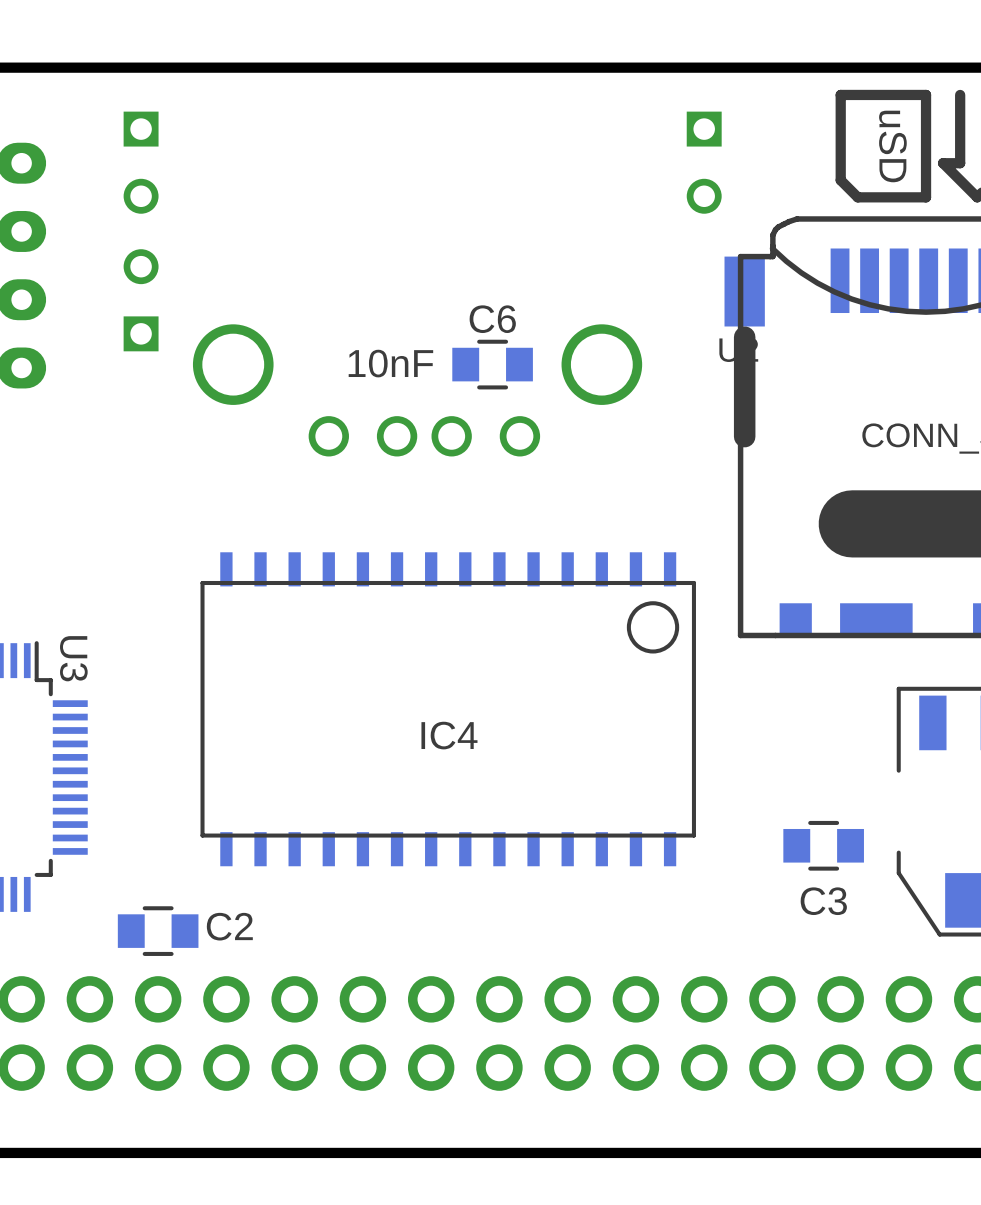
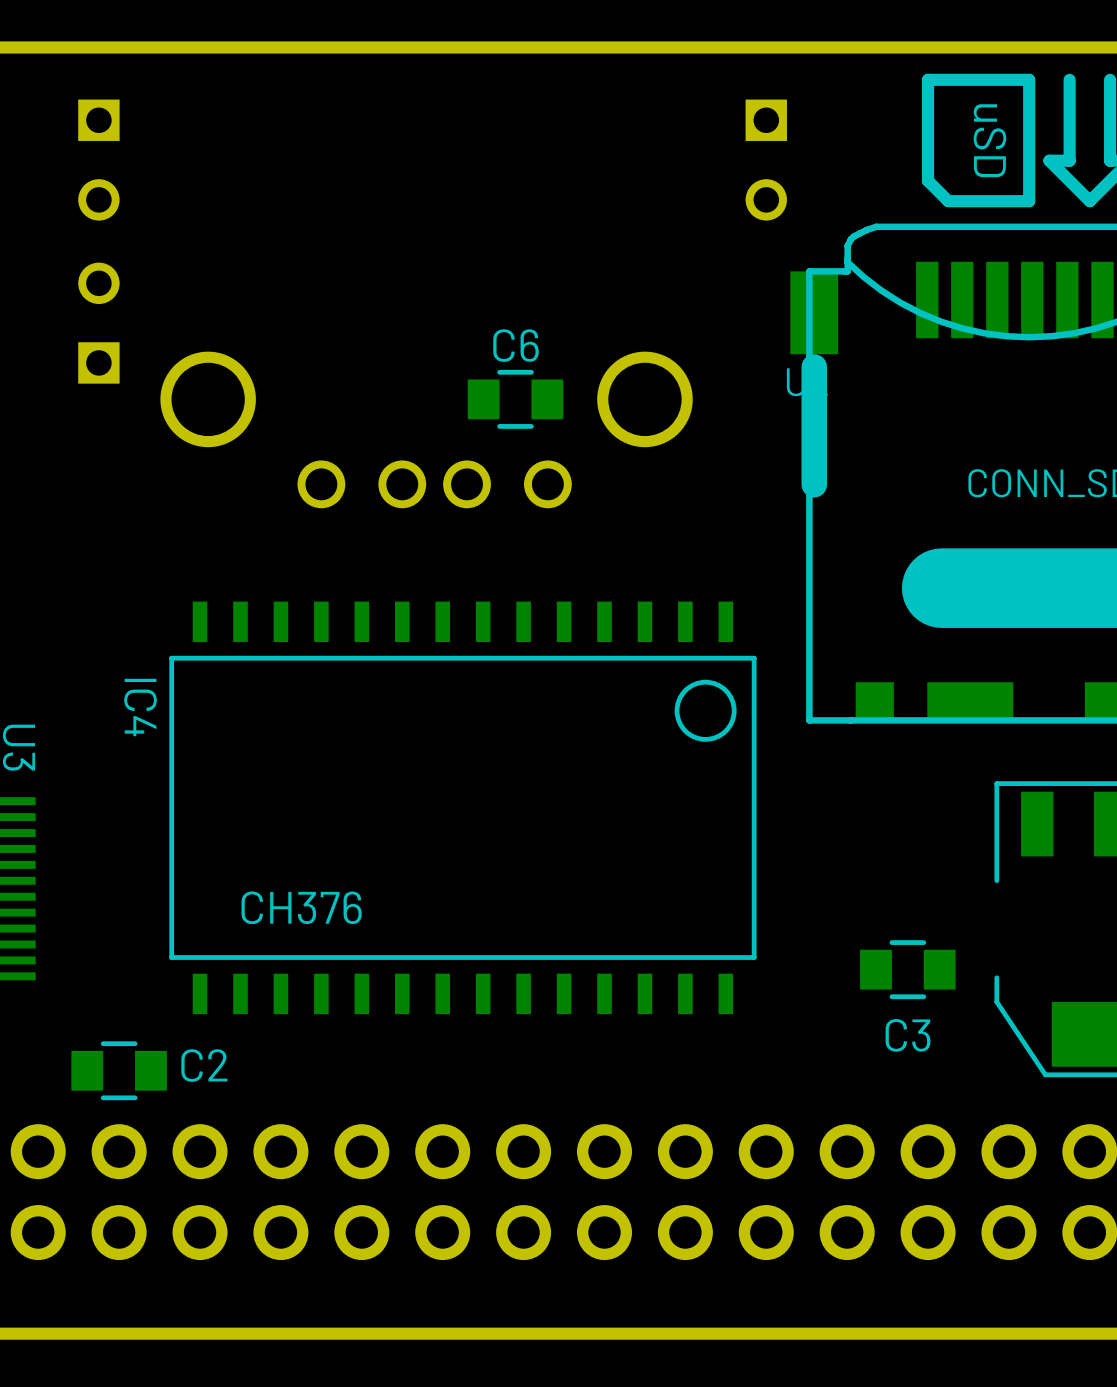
C6 value: 10nF (390, 363) -> none
IC4 footprint: [200, 552, 696, 867] -> [169, 601, 757, 1015]
IC4 name rotation: 0° (449, 735) -> 90° clockwise (140, 707)
IC4 name position: IC4 (449, 735) -> IC4 (140, 707)
IC4 value: none -> CH376 (301, 907)

